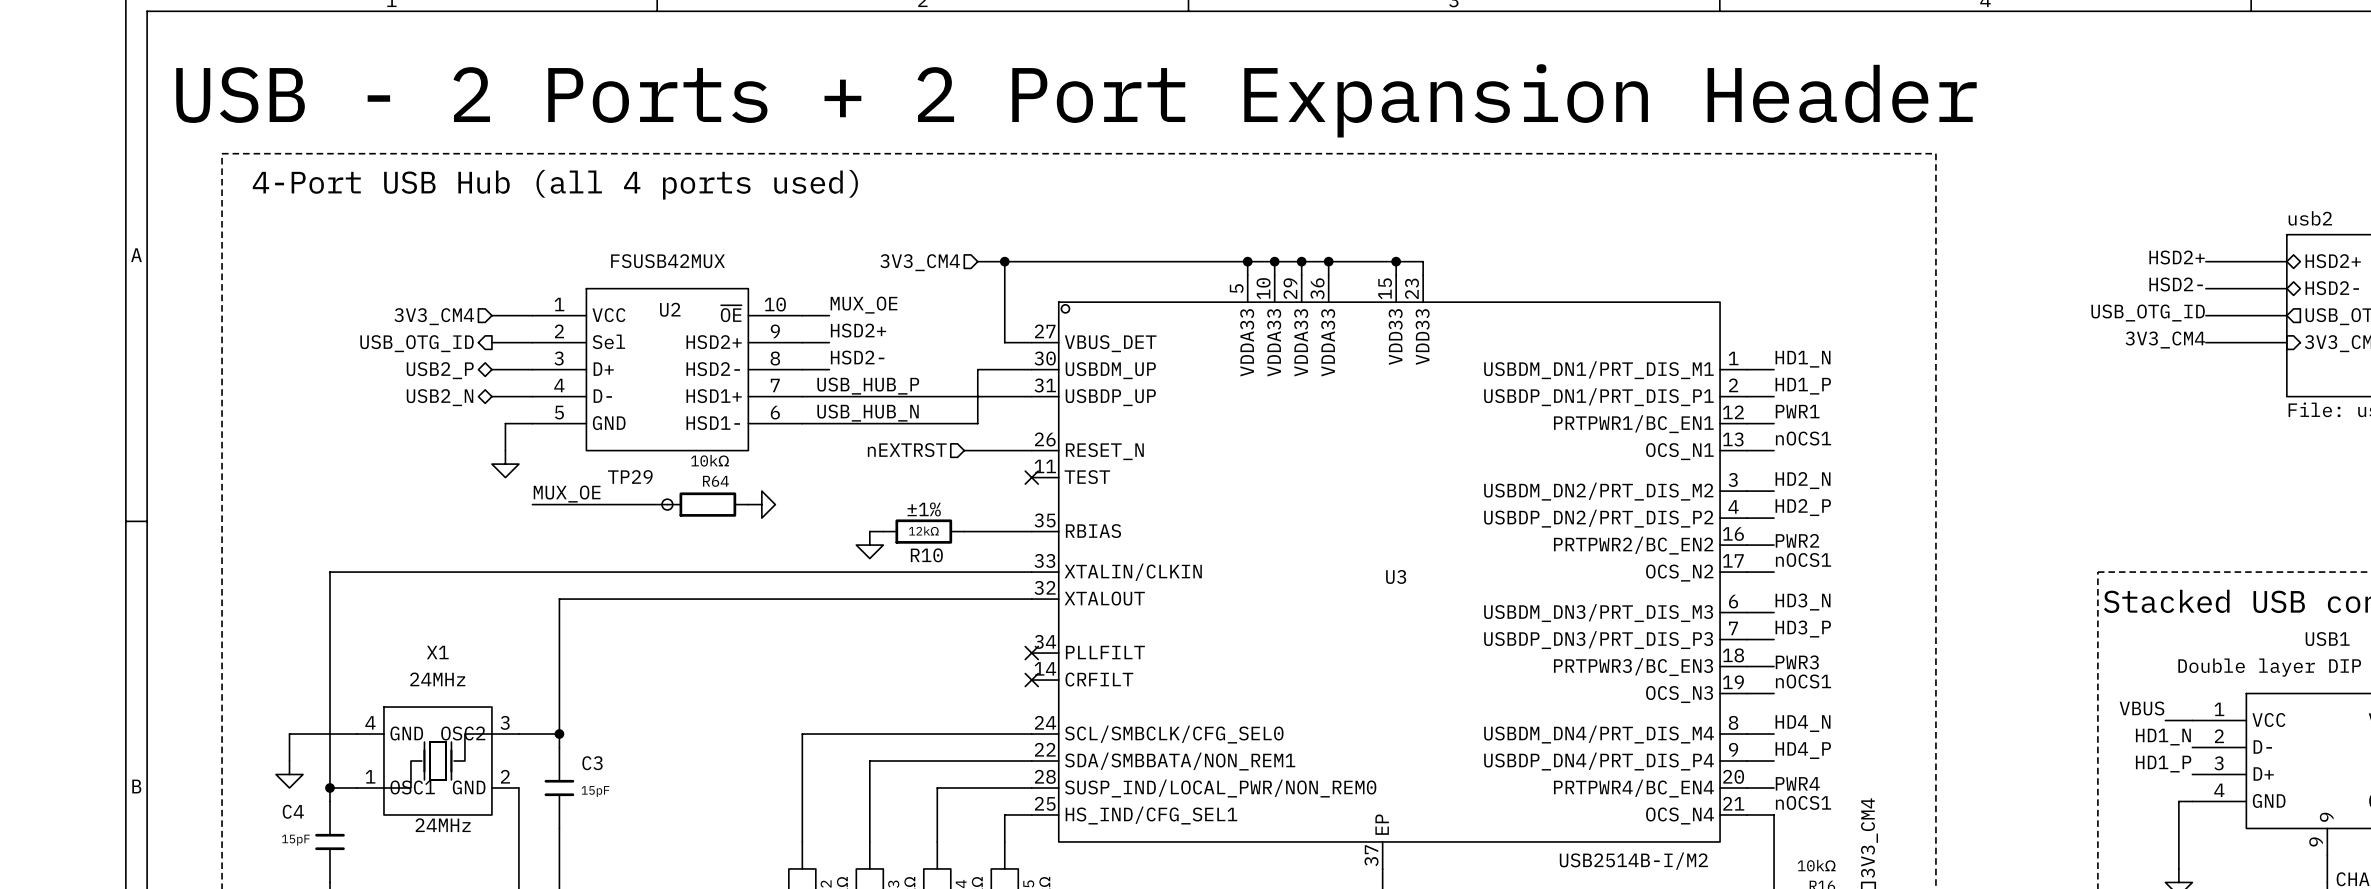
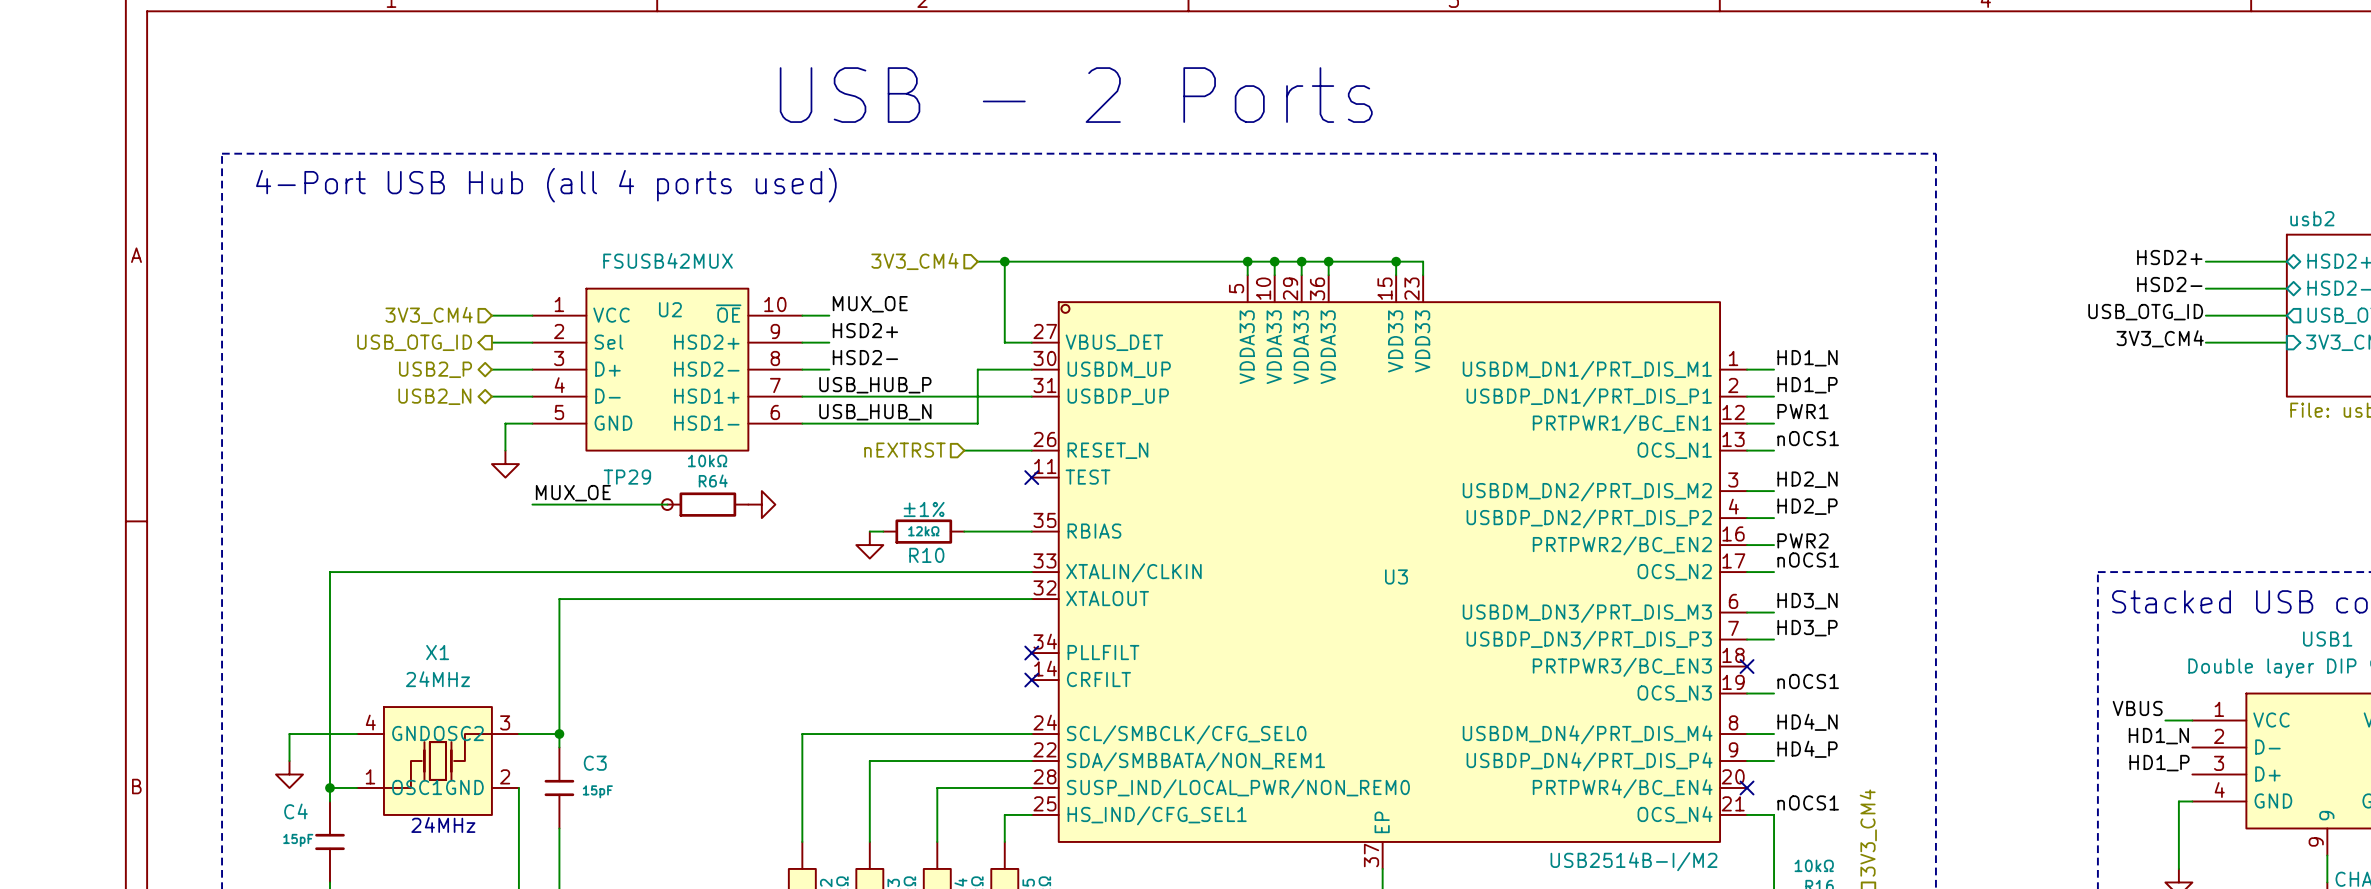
text: USB - 2 Ports + 2 Port Expansion Header (1076, 100) -> USB - 2 Ports (1076, 95)
label: PWR3 (1797, 662) -> none
wire: (1747, 666) (1774, 666) -> none
no-connect mark: none -> (1747, 666)
label: PWR4 (1797, 783) -> none
wire: (1747, 787) (1774, 787) -> none
no-connect mark: none -> (1747, 787)

